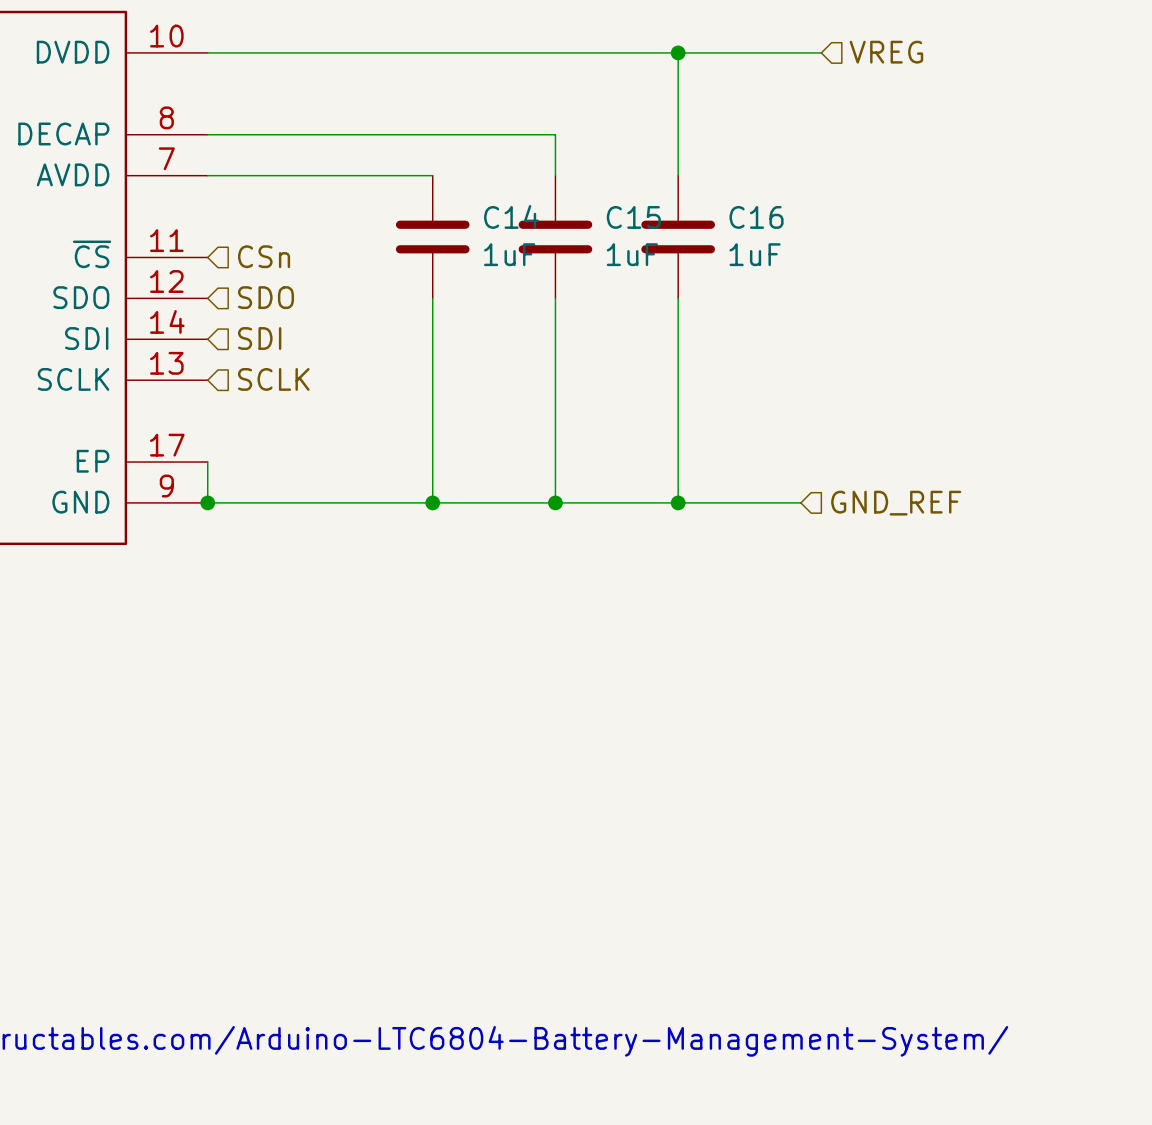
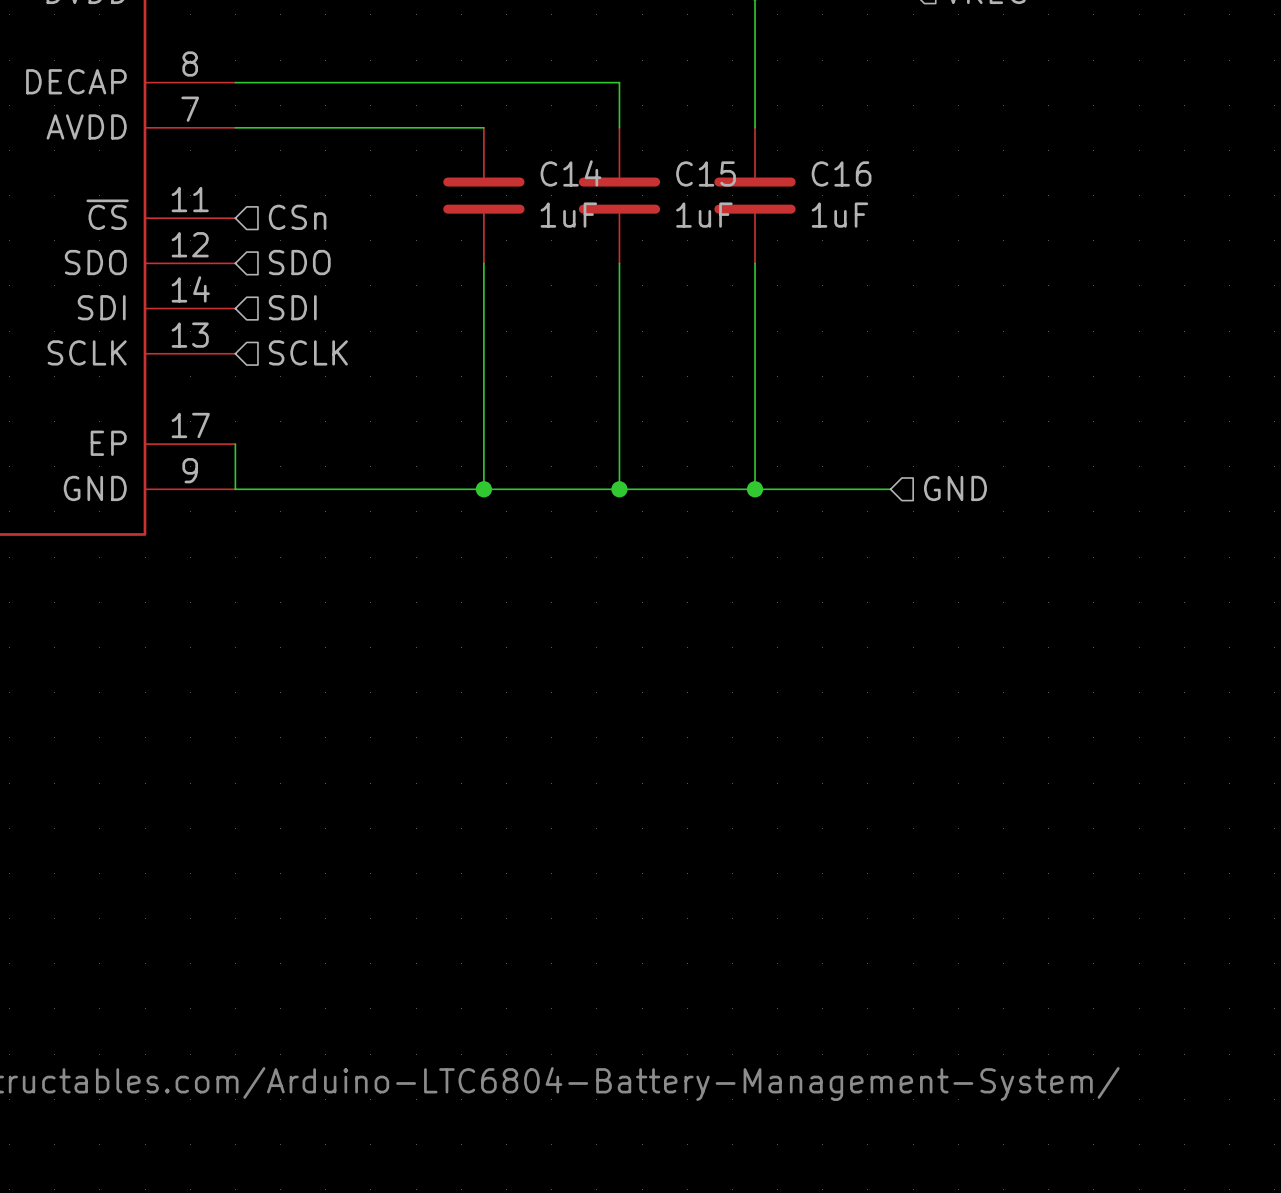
junction: (207, 502) -> none
hierarchical label: GND_REF (896, 503) -> GND (955, 488)

